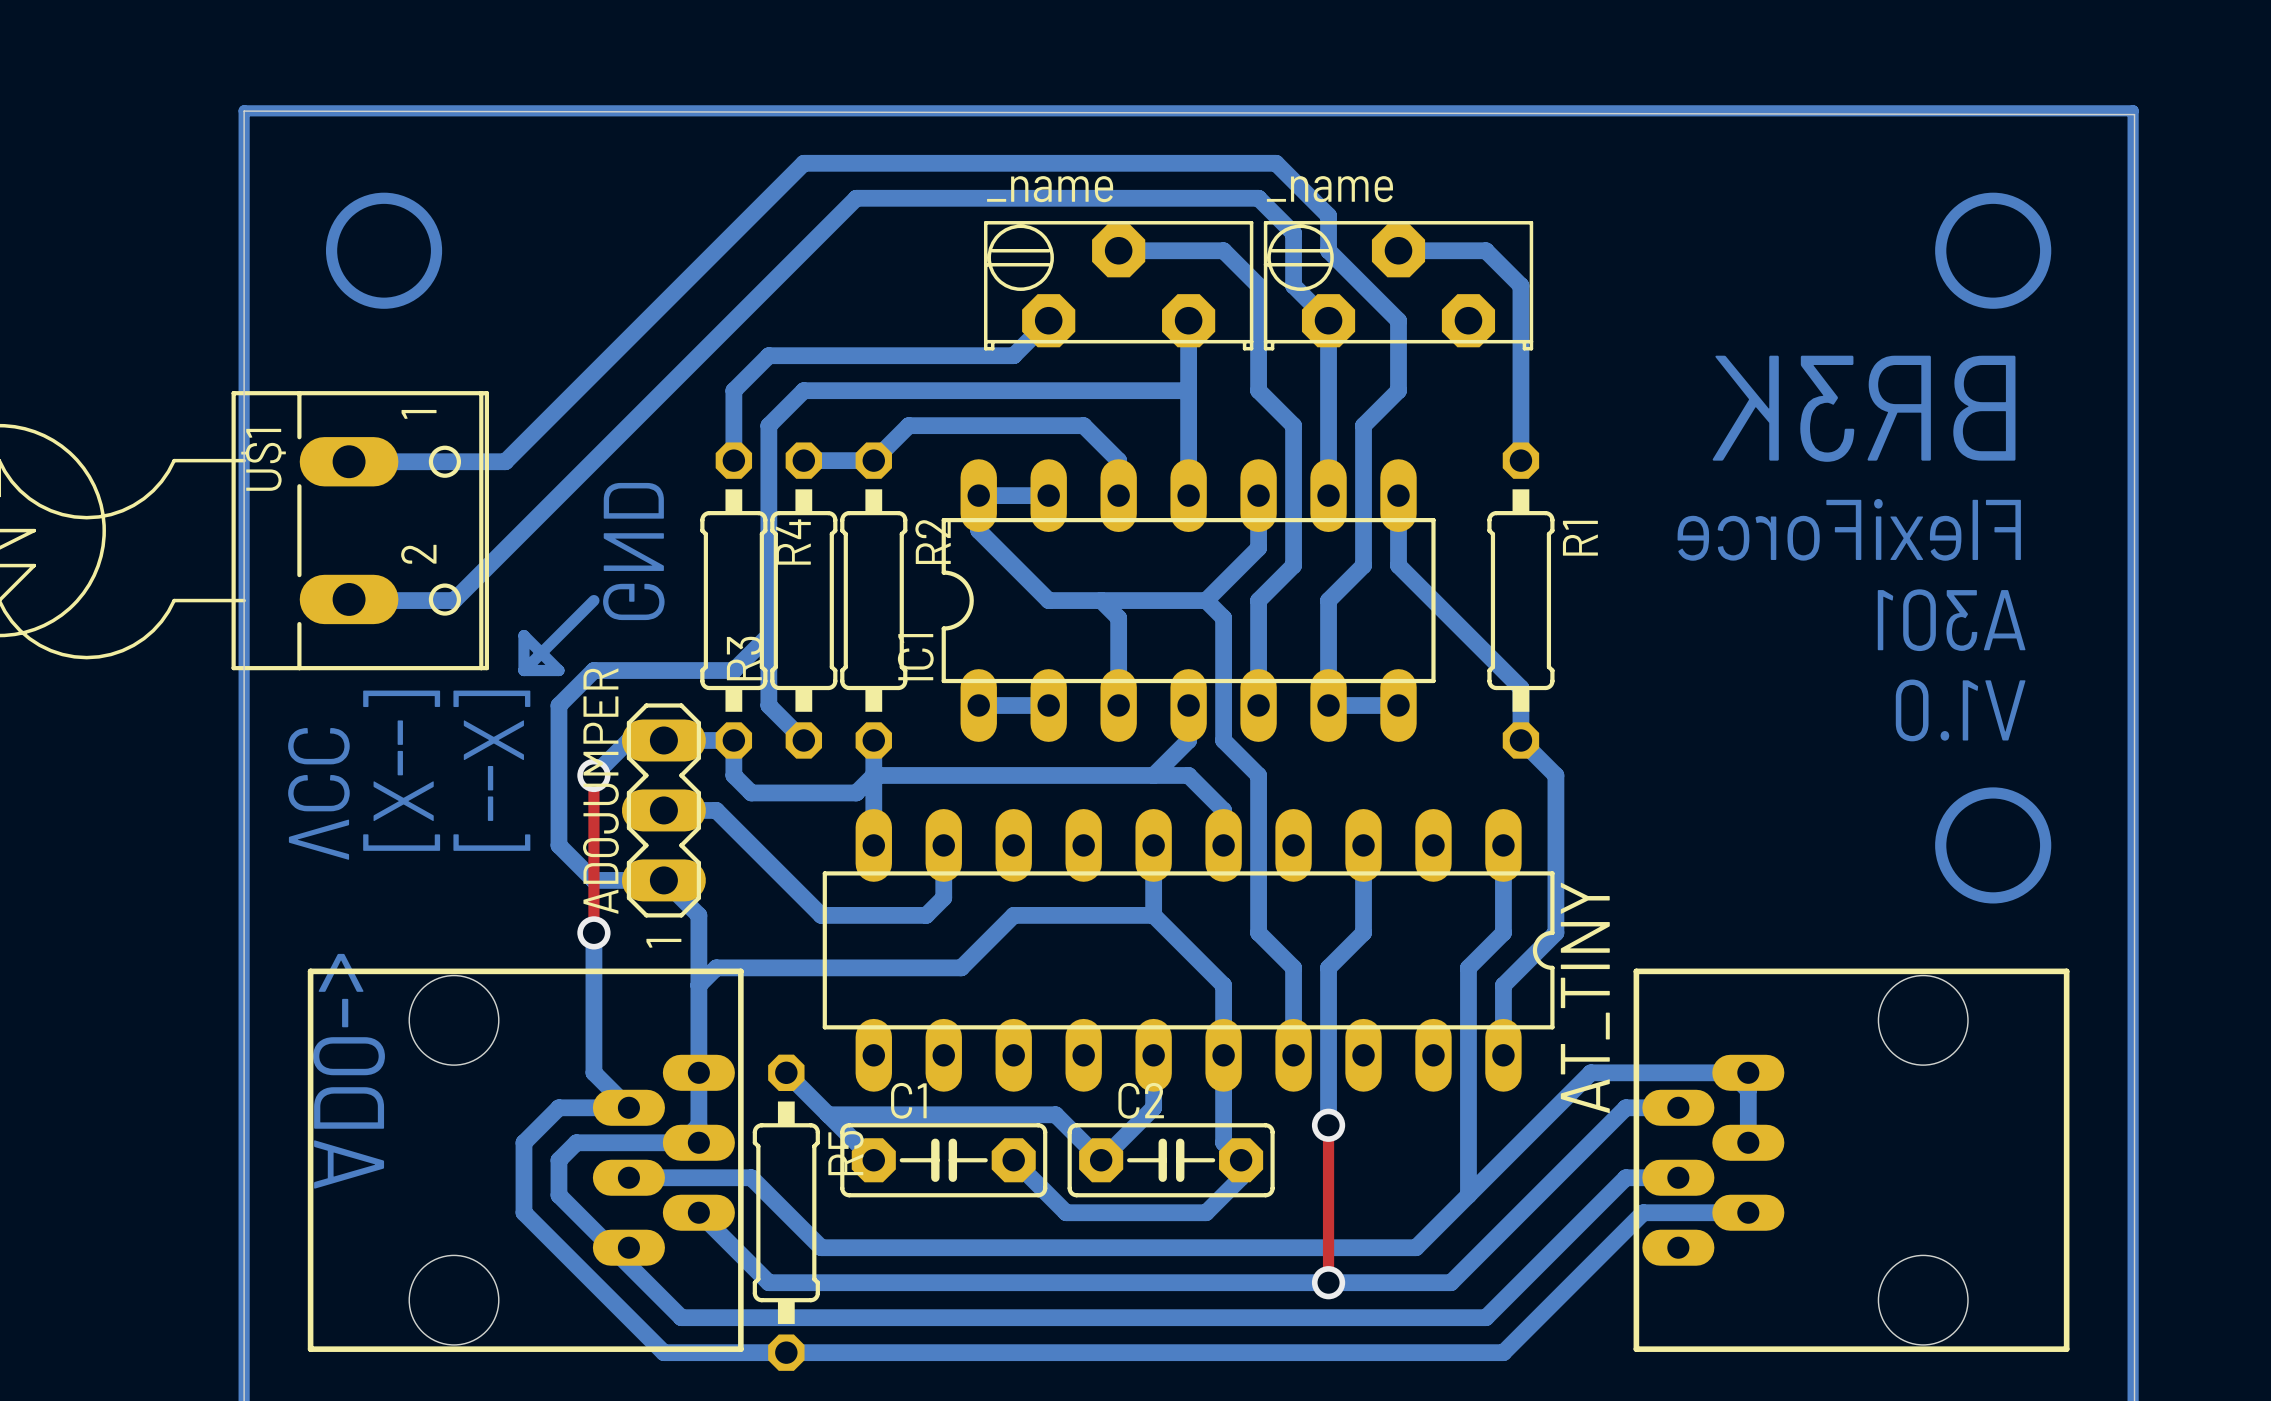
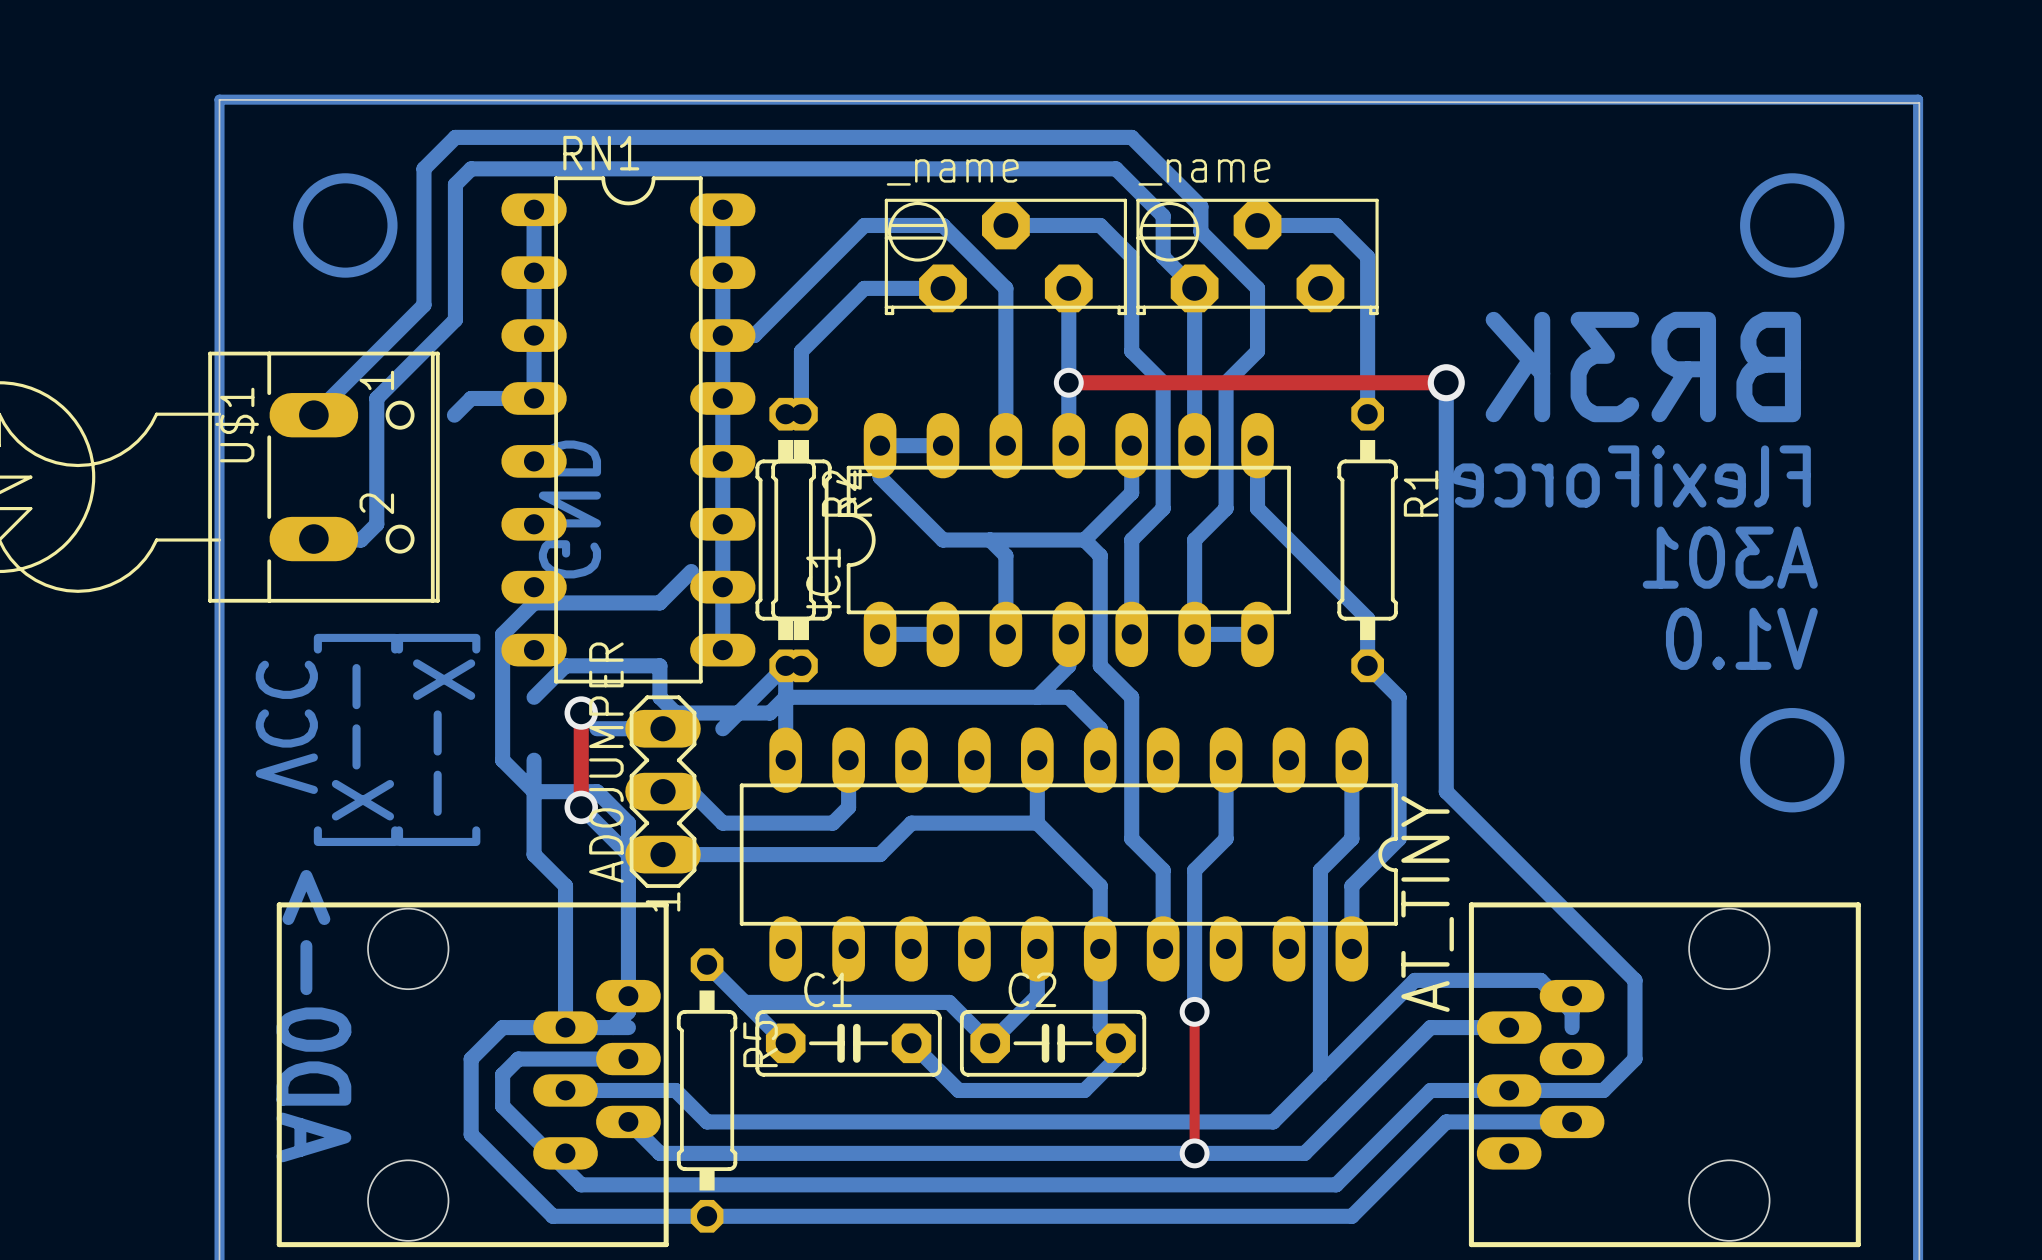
bottom track: none -> (534, 209) (534, 398) (471, 398)
bottom track: none -> (722, 209) (722, 650)
bottom track: (1293, 240) (1293, 233) (1258, 198) (856, 198) (454, 600) (401, 600) -> (1163, 216) (1115, 168) (471, 168) (455, 184) (455, 319) (376, 398) (376, 524) (361, 540)
bottom track: (1335, 257) (1328, 250) (1328, 215) (1276, 163) (803, 163) (523, 443) -> (1200, 231) (1200, 206) (1131, 137) (455, 137) (423, 168) (423, 305) (313, 415)
bottom track: (1048, 320) (1013, 355) (768, 355) (733, 390) (733, 460) -> (942, 288) (864, 288) (801, 351) (801, 414)
bottom track: (1188, 390) (803, 390) (768, 425) (768, 705) (803, 740) -> none
top track: none -> (1068, 382) (1446, 382)
via: none -> (1068, 382)
bottom track: none -> (1446, 382) (1446, 791) (1634, 980) (1634, 1059) (1603, 1090) (1572, 1090)
via: none -> (1446, 382)
bottom track: (803, 460) (873, 460) (908, 425) (1083, 425) (1118, 460) -> (722, 335) (754, 335) (864, 225) (942, 225) (1005, 288) (1005, 414)
bottom track: (349, 461) (505, 461) -> none
RN1: none -> (628, 429)
bottom track: (593, 600) (523, 670) -> none
R4 position: (733, 600) -> (801, 540)
R3: (803, 600) -> none
bottom track: (523, 670) (558, 670) (523, 635) (523, 670) -> none
bottom track: none -> (801, 665) (785, 665) (722, 728)
top track: (593, 775) (593, 932) -> none
via: (593, 775) -> none
top track: none -> (581, 713) (581, 807)
via: none -> (581, 713)
AD0JUMPER position: (663, 810) -> (663, 791)
bottom track: (716, 810) (821, 915) -> (663, 791) (691, 791) (722, 823) (738, 823)
bottom track: none -> (534, 760) (534, 838)
via: none -> (581, 807)
via: (593, 932) -> none
bottom track: (593, 950) (593, 1072) (628, 1107) (558, 1107) (523, 1142) (523, 1177) -> (534, 854) (565, 886) (565, 1027)
bottom track: (978, 950) (961, 967) (716, 967) (698, 985) -> (880, 854) (628, 854) (581, 807)
bottom track: (1573, 1090) (1590, 1072) (1730, 1072) (1748, 1090) (1748, 1125) -> (1414, 980) (1540, 980) (1572, 1011)
bottom track: (1678, 1107) (1625, 1107) (1590, 1142) -> (1509, 1027) (1430, 1027)
bottom track: (576, 1142) (558, 1160) (558, 1195) (681, 1317) -> (565, 1059) (518, 1059) (502, 1074) (502, 1106) (581, 1184) (612, 1184)
bottom track: none -> (518, 1027) (502, 1027) (471, 1059)
part position: (525, 1160) -> (472, 1074)
part position: (1851, 1160) -> (1664, 1074)
bottom track: (698, 1177) (751, 1177) (821, 1247) -> (565, 1090) (675, 1090) (707, 1121) (738, 1121)
bottom track: (1678, 1177) (1625, 1177) (1590, 1212) -> none
bottom track: (523, 1212) (663, 1352) -> (471, 1090) (471, 1134) (552, 1216) (596, 1216)
bottom track: (698, 1212) (768, 1282) -> (628, 1121) (659, 1153) (691, 1153)
bottom track: (1643, 1212) (1608, 1247) -> (1477, 1090) (1430, 1090)
bottom track: none -> (1446, 1121) (1572, 1121)

